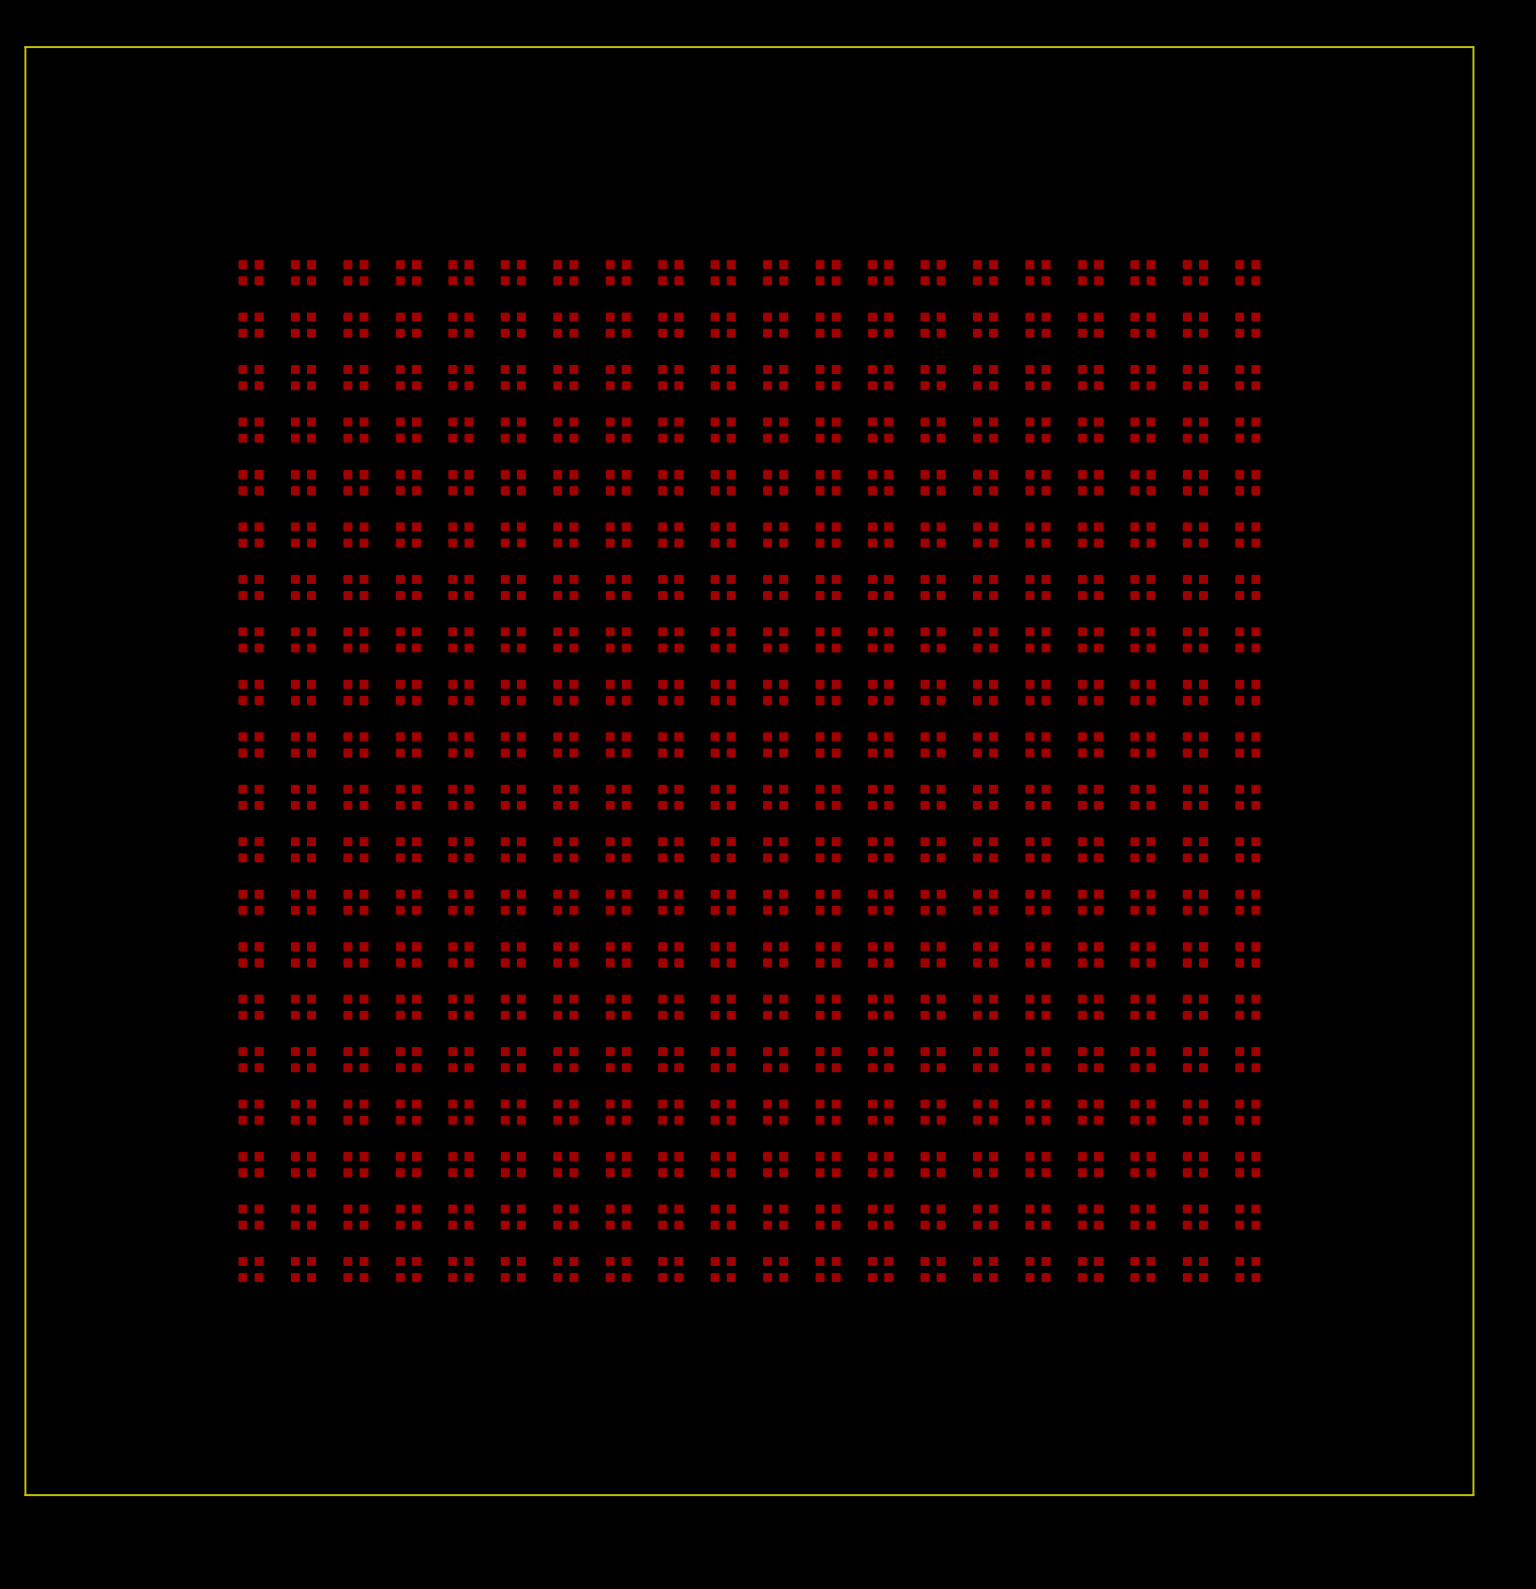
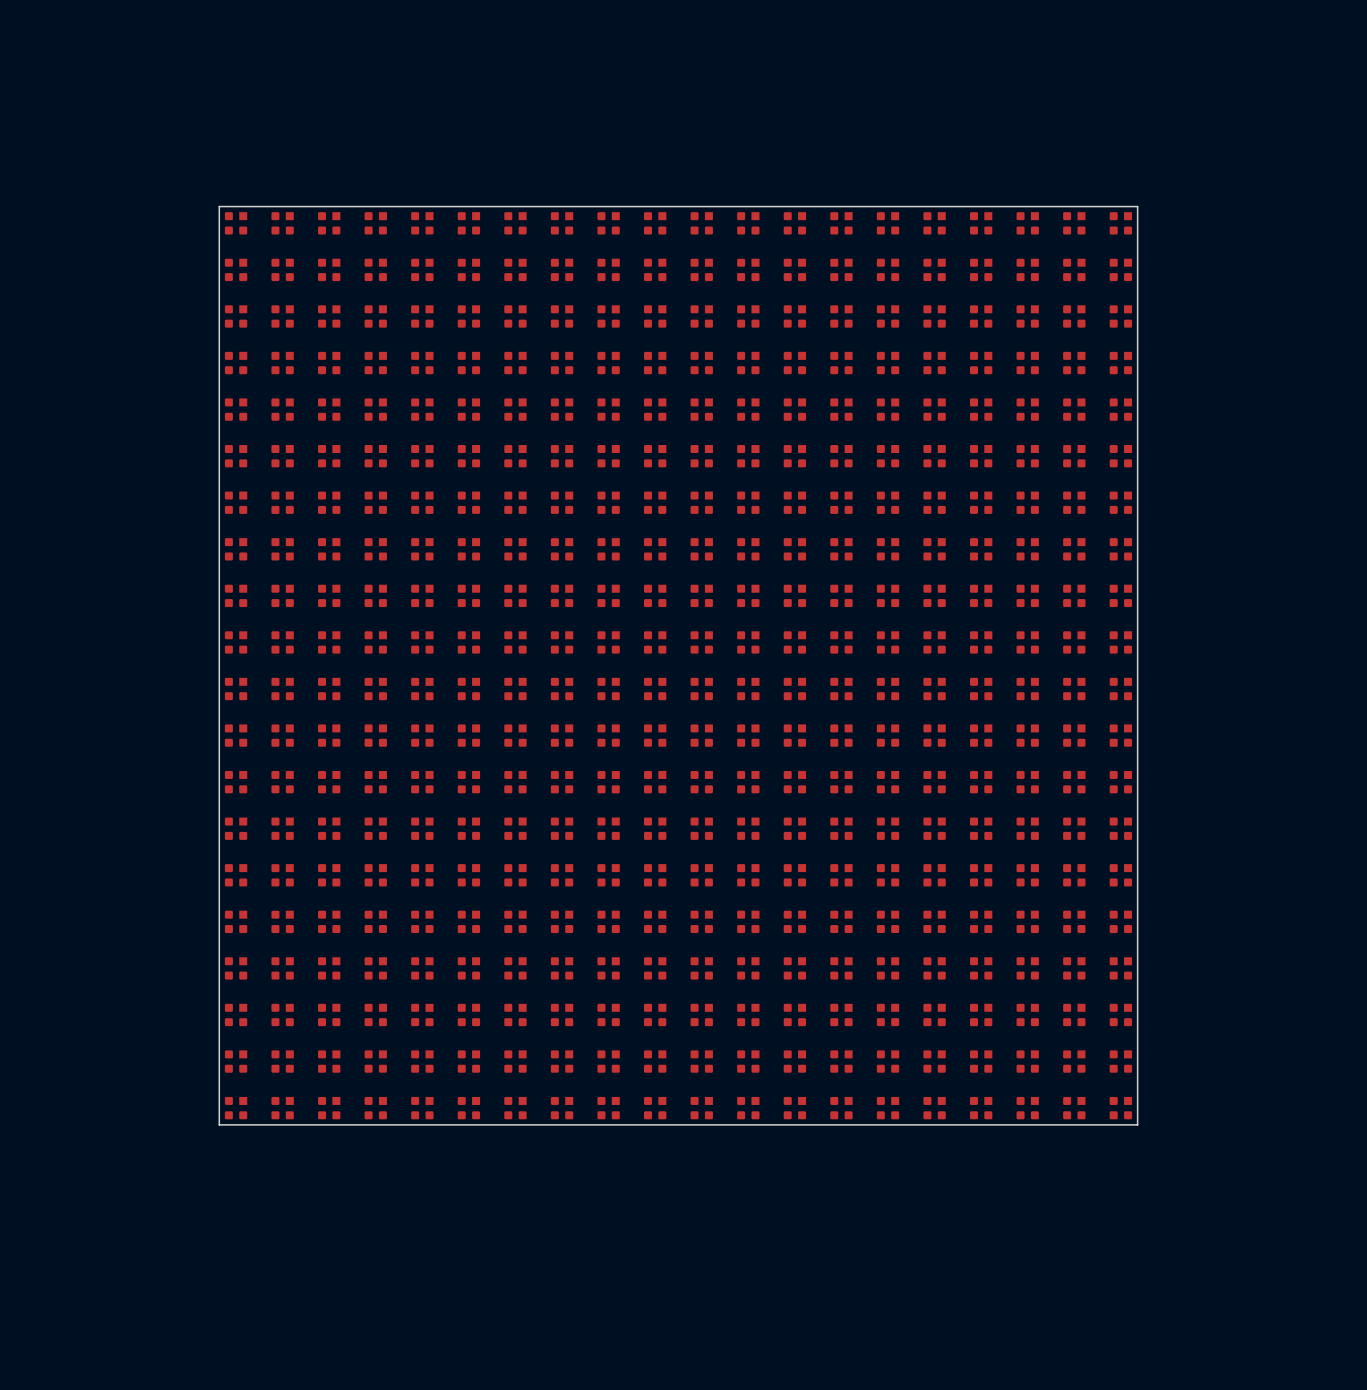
board edge: (25, 47) (1473, 47) (1473, 1495) (25, 1495) (25, 47) -> (219, 206) (219, 1124) (1137, 1124) (1137, 206) (219, 206)

